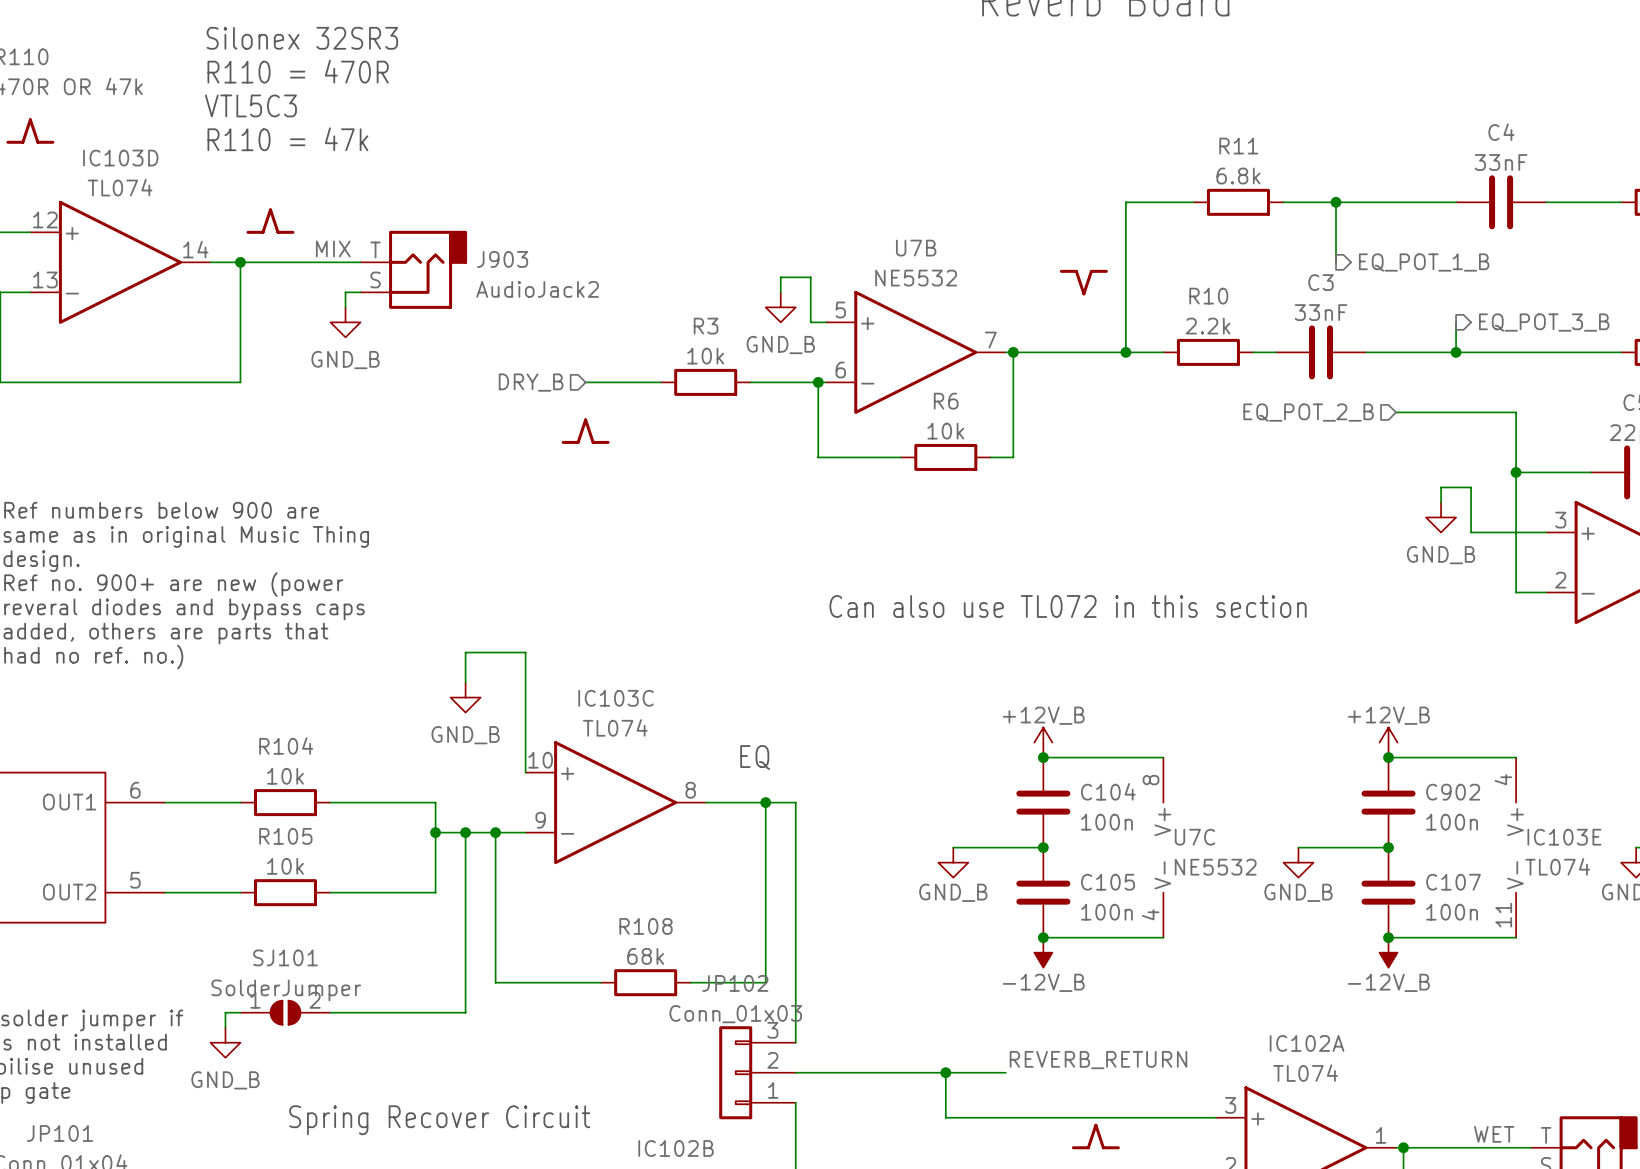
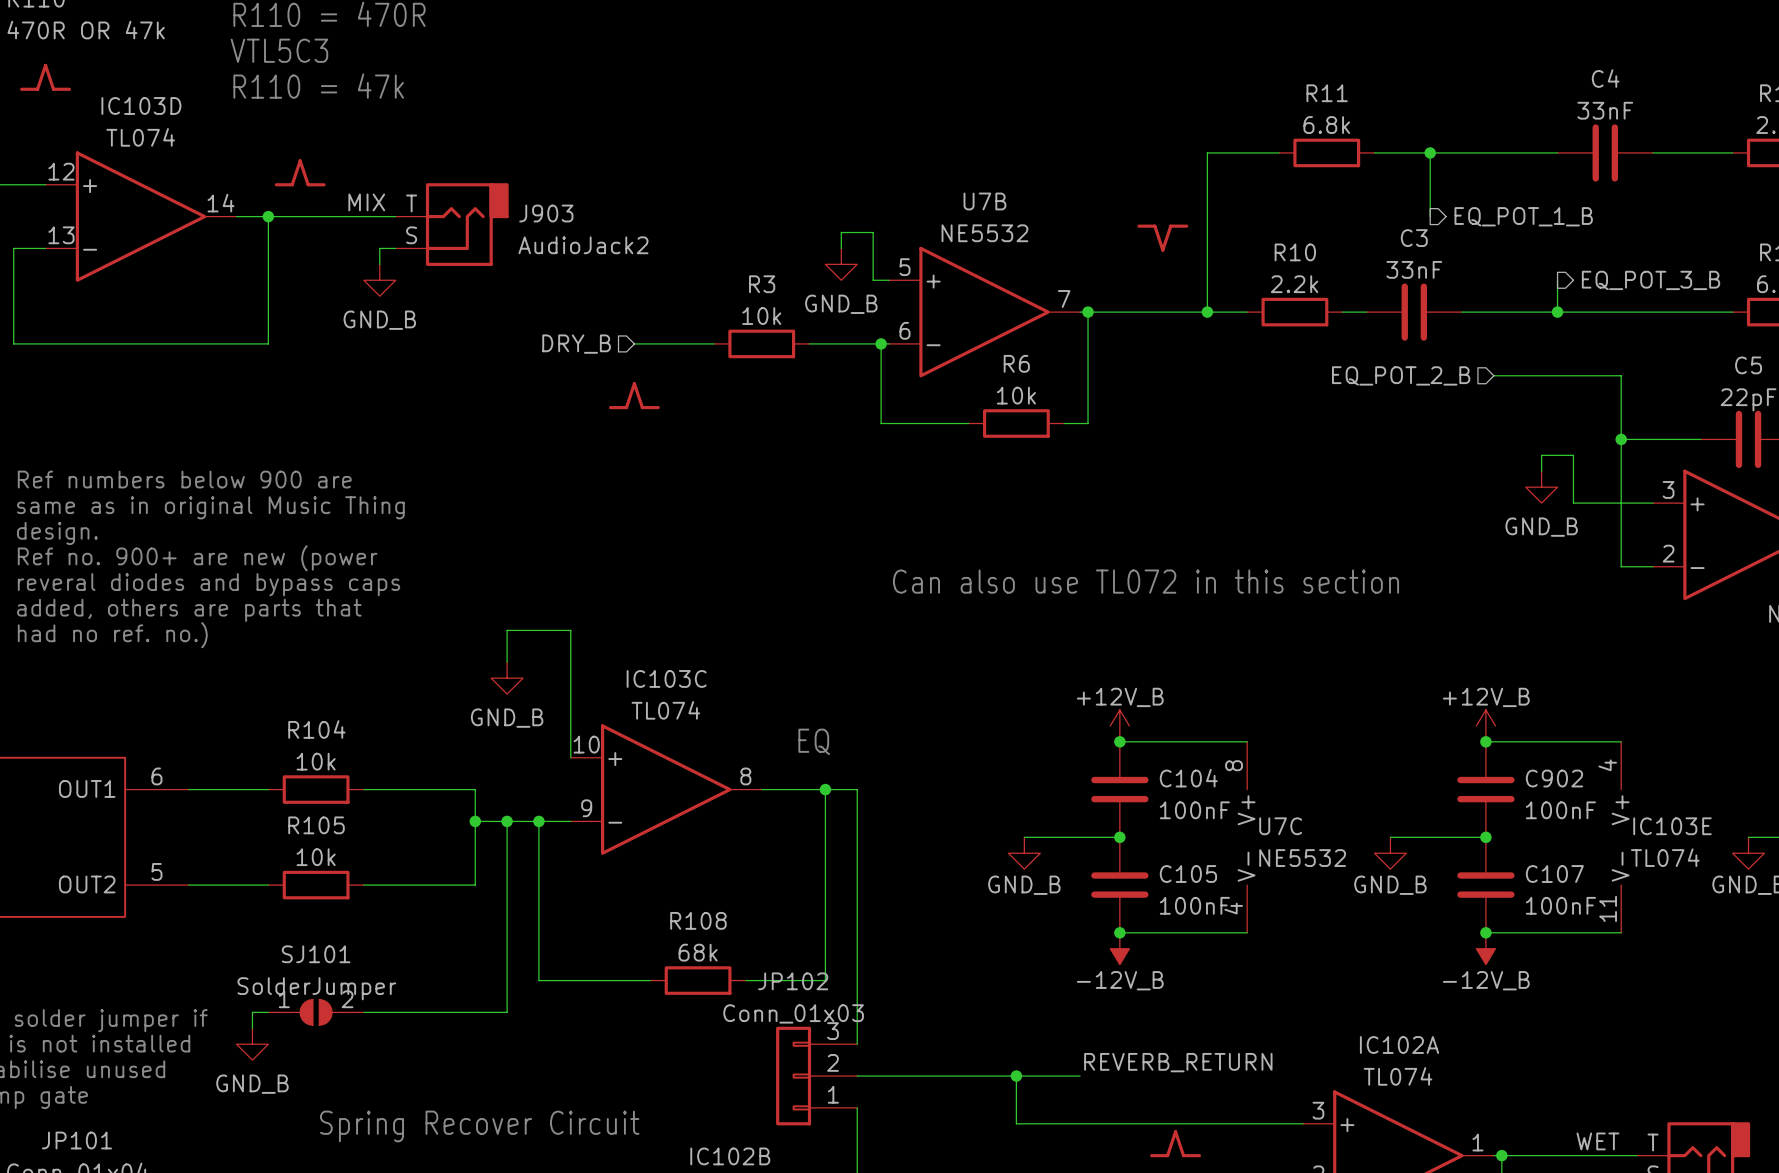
C104 value: 100n (1106, 822) -> 100nF (1194, 810)
C902 value: 100n (1452, 822) -> 100nF (1560, 810)
C105 value: 100n (1106, 912) -> 100nF (1194, 905)
C107 value: 100n (1452, 912) -> 100nF (1560, 905)

